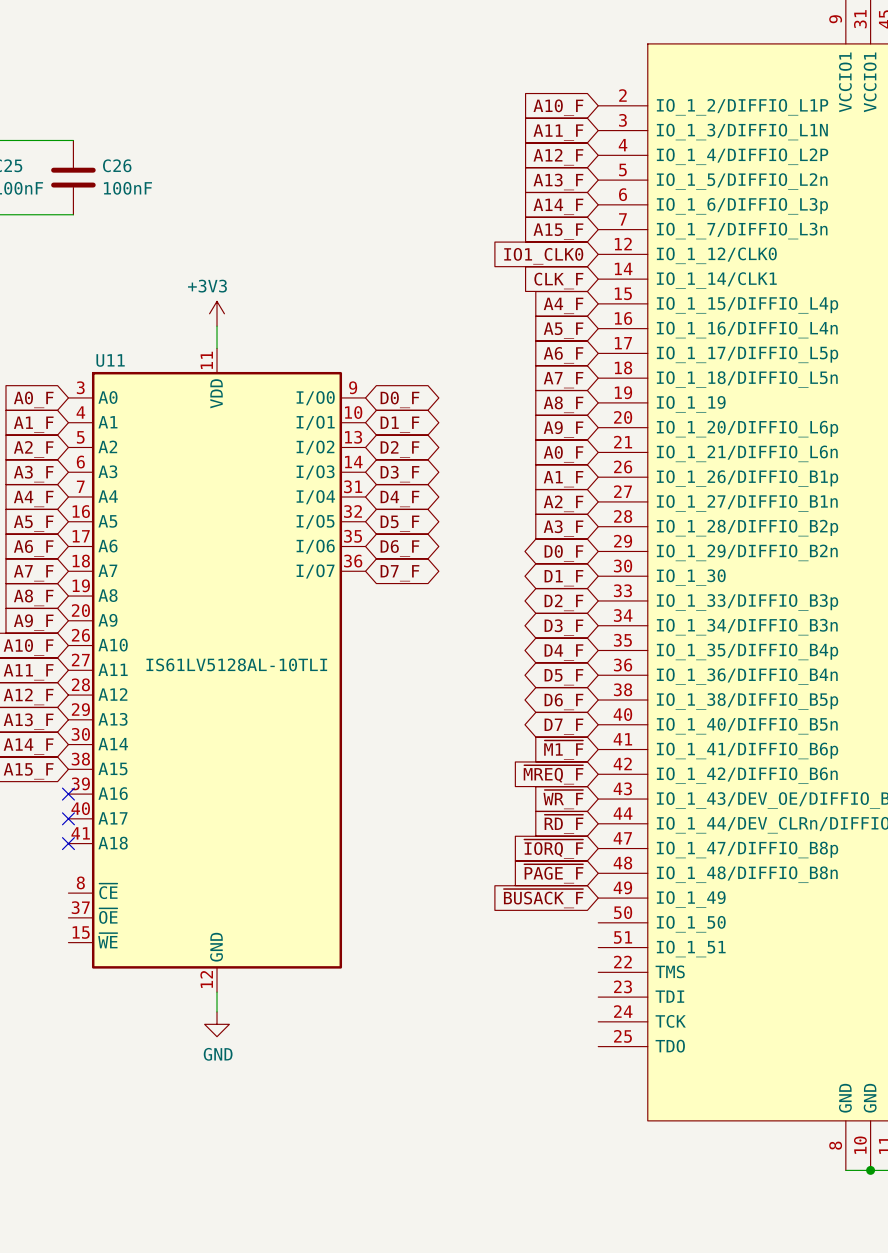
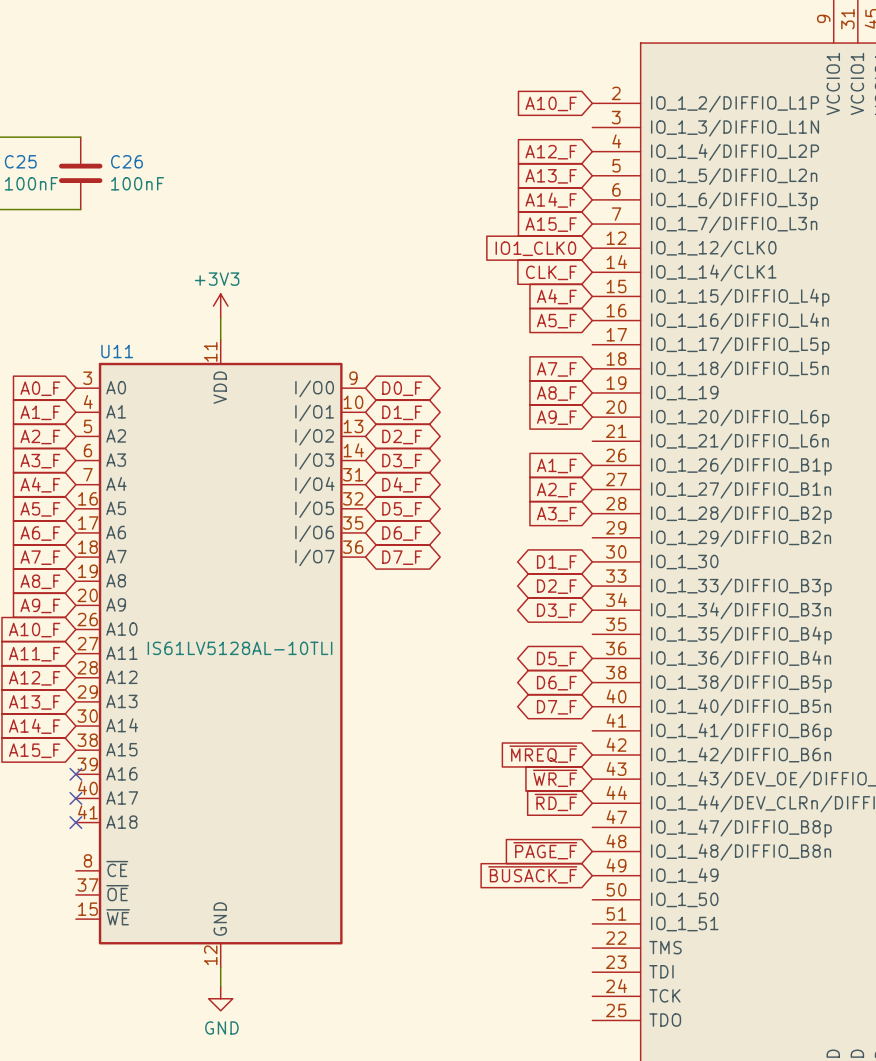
global label: A11_F (558, 132) -> none
global label: A6_F (563, 355) -> none
global label: A0_F (563, 454) -> none
global label: D0_F (563, 553) -> none
global label: D4_F (563, 652) -> none
global label: ~{M1_F} (563, 750) -> none
global label: ~{IORQ_F} (553, 849) -> none

